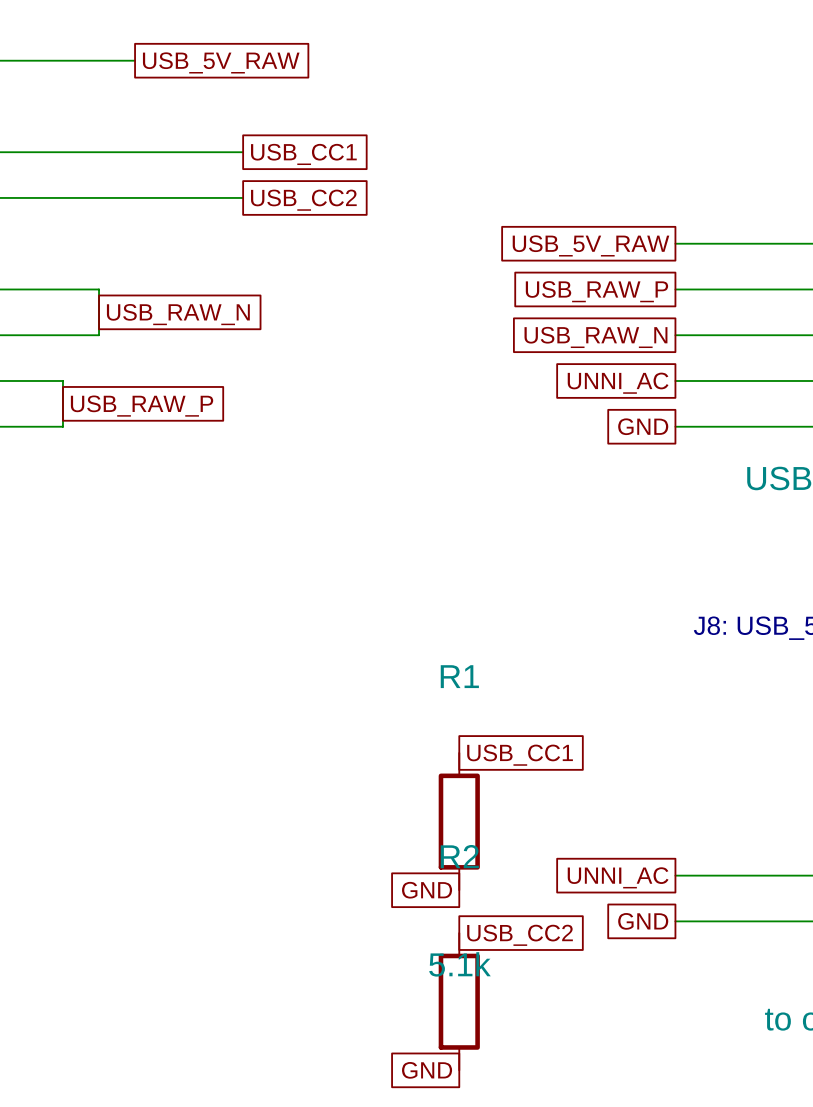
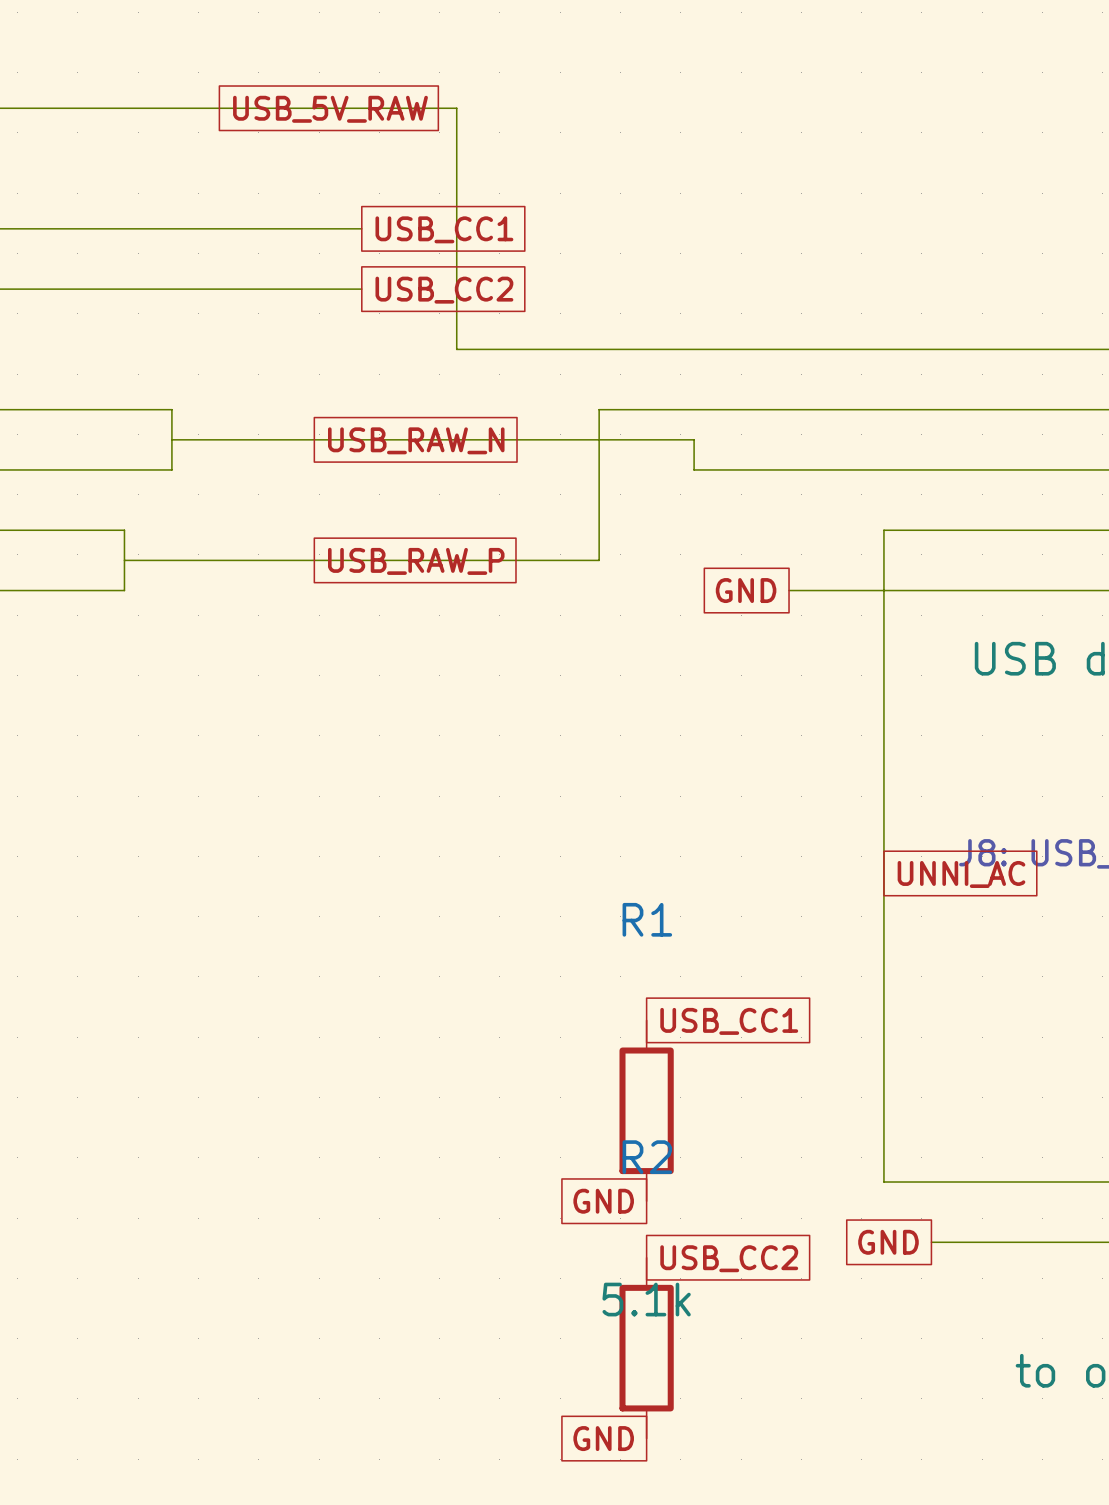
wire: none -> (219, 108) (456, 108) (456, 349) (931, 349)
global label: USB_5V_RAW (590, 245) -> none
wire: none -> (931, 409) (599, 409) (599, 560) (124, 560)
global label: USB_RAW_P (596, 291) -> none
wire: none -> (171, 439) (694, 439) (694, 469) (931, 469)
global label position: USB_RAW_N (178, 314) -> USB_RAW_N (416, 440)
global label: USB_RAW_N (595, 337) -> none
wire: none -> (931, 530) (883, 530) (883, 1182) (931, 1182)
global label: UNNI_AC (618, 383) -> none
global label position: USB_RAW_P (142, 406) -> USB_RAW_P (416, 561)
wire: none -> (789, 590) (931, 590)
global label position: GND (643, 426) -> GND (746, 590)
global label: none -> UNNI_AC (961, 874)
global label: UNNI_AC (618, 877) -> none

